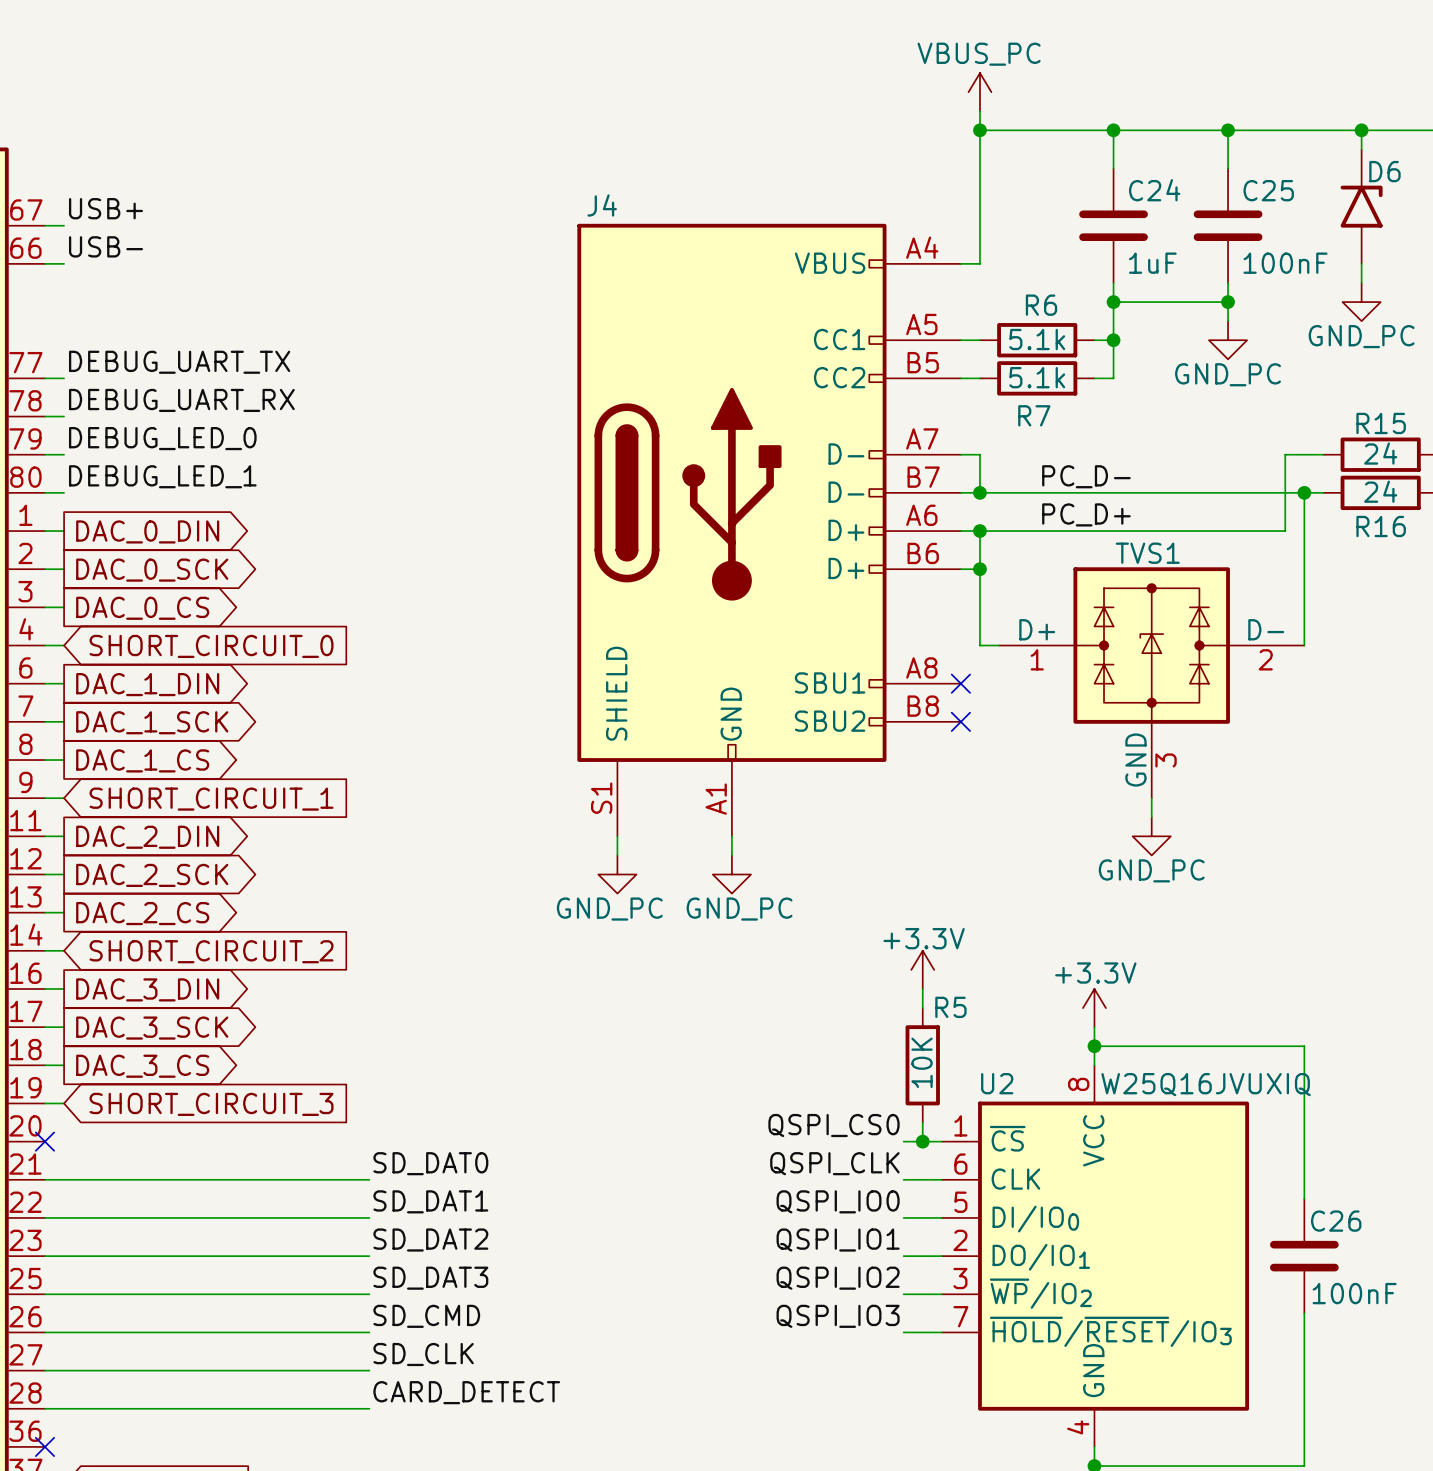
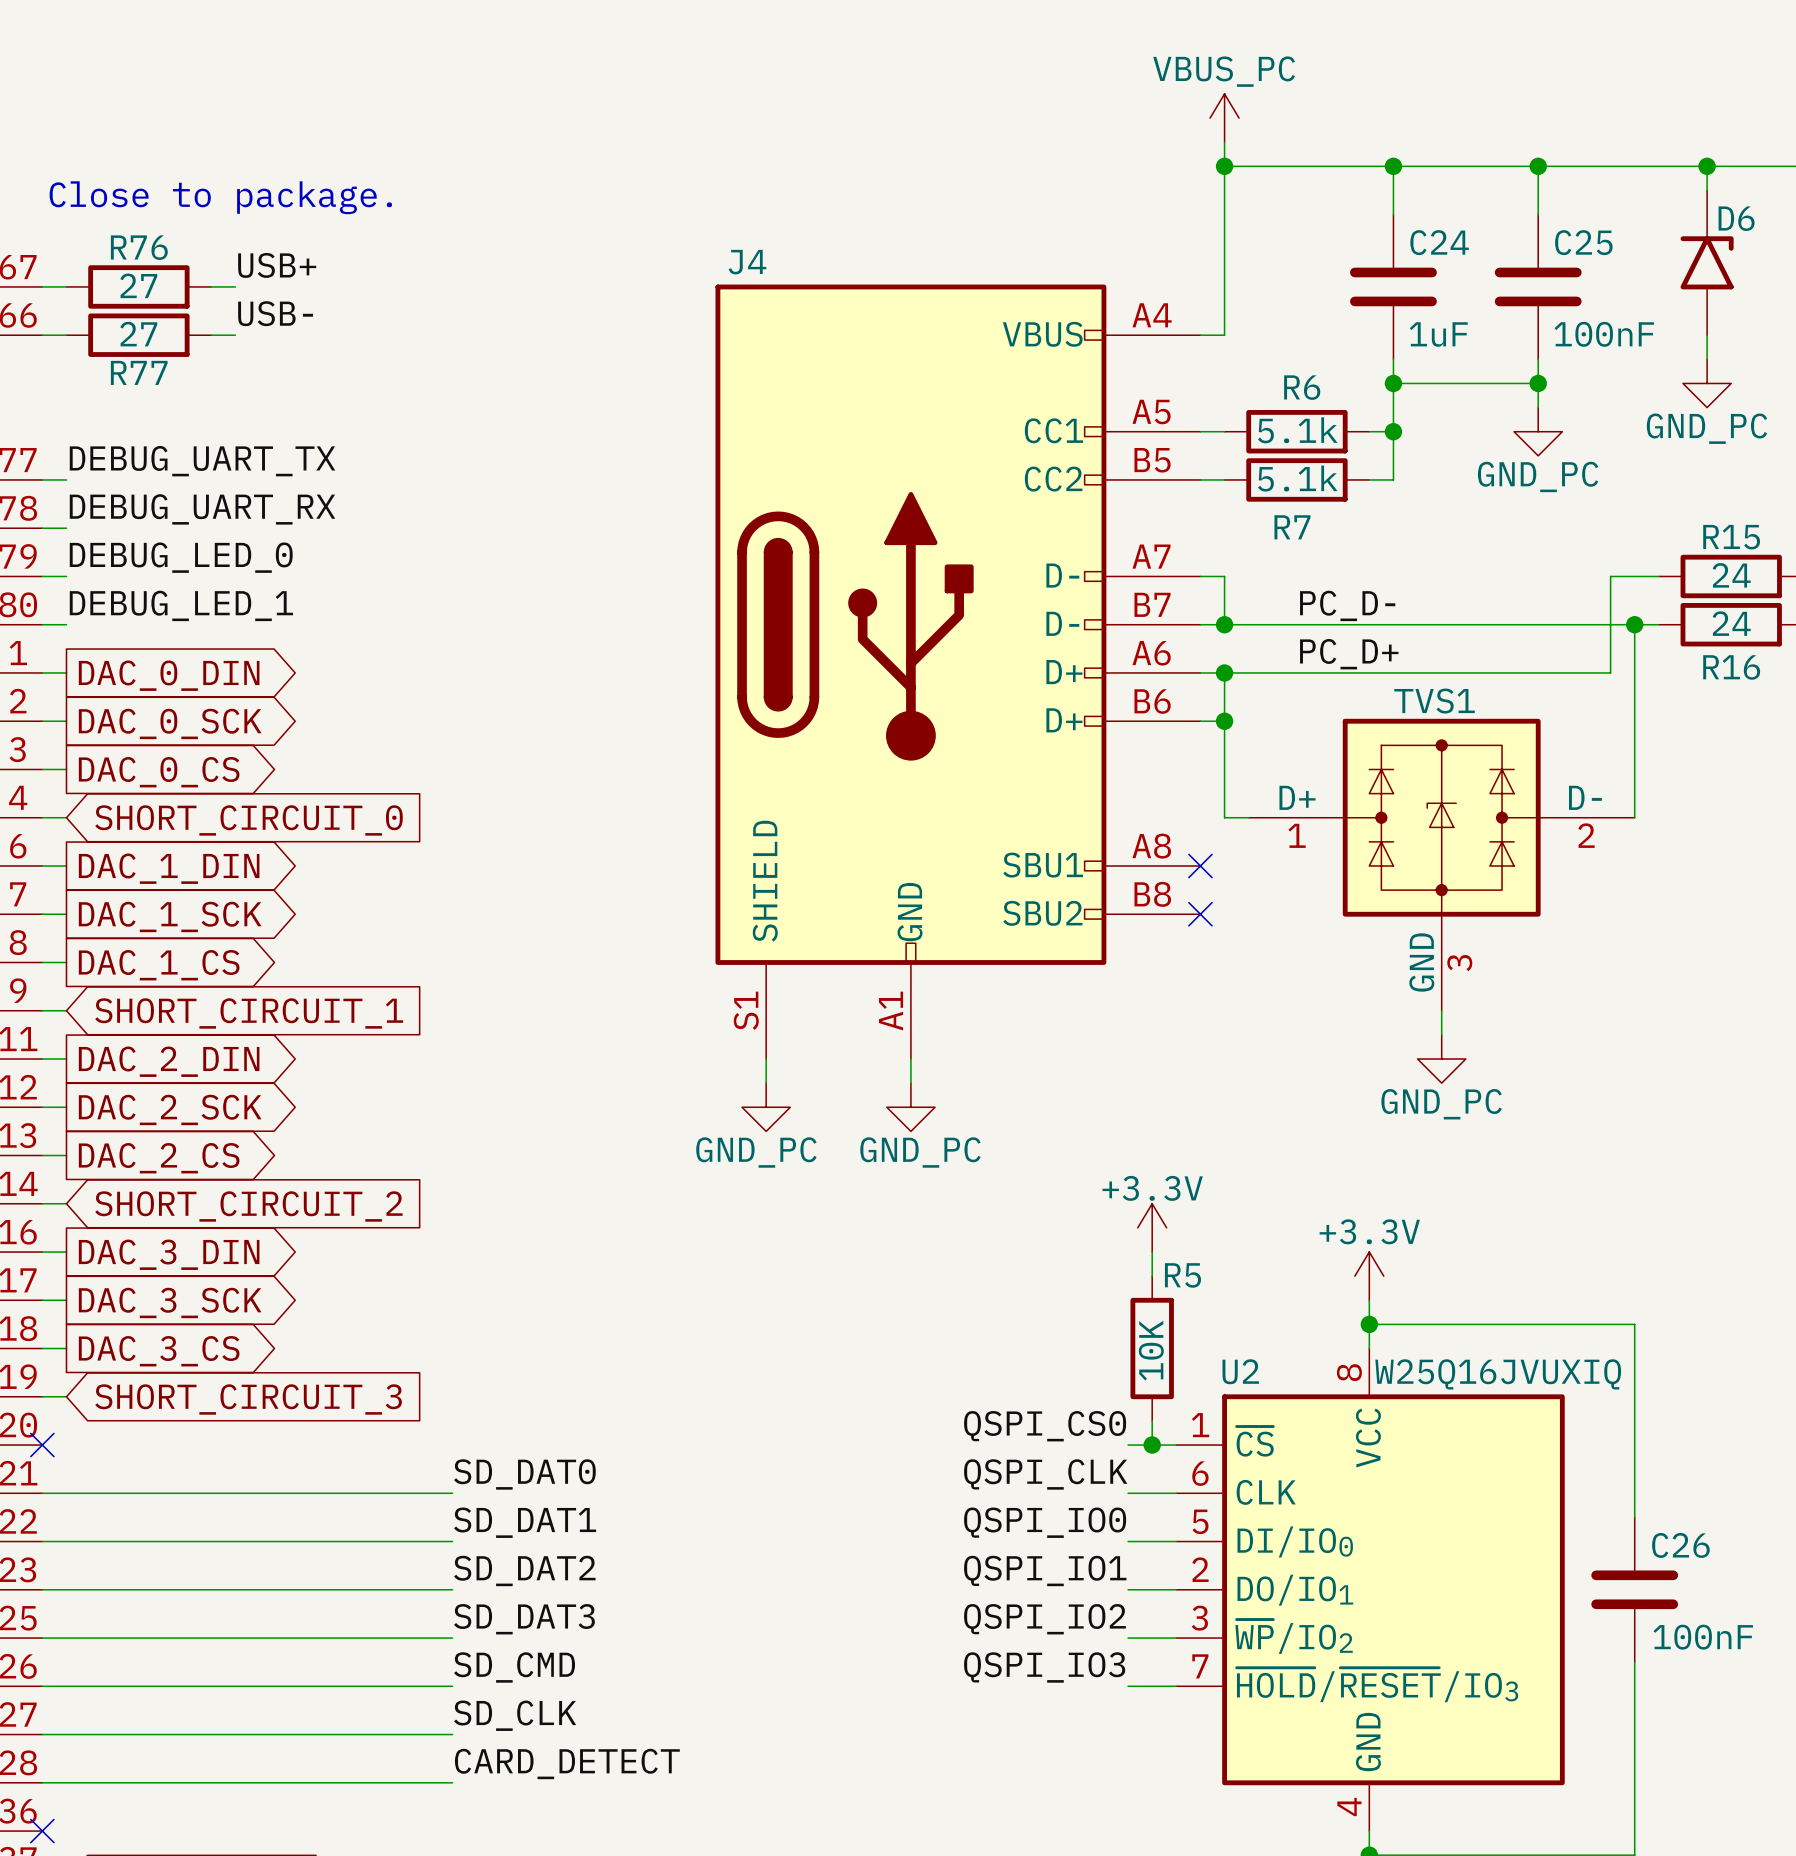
text: none -> Close to package. (220, 197)
label position: USB+ (106, 208) -> USB+ (277, 265)
R76: none -> 27 (138, 286)
wire: none -> (211, 286) (235, 286)
label position: USB- (106, 246) -> USB- (275, 313)
R77: none -> 27 (138, 335)
wire: none -> (211, 335) (235, 335)

